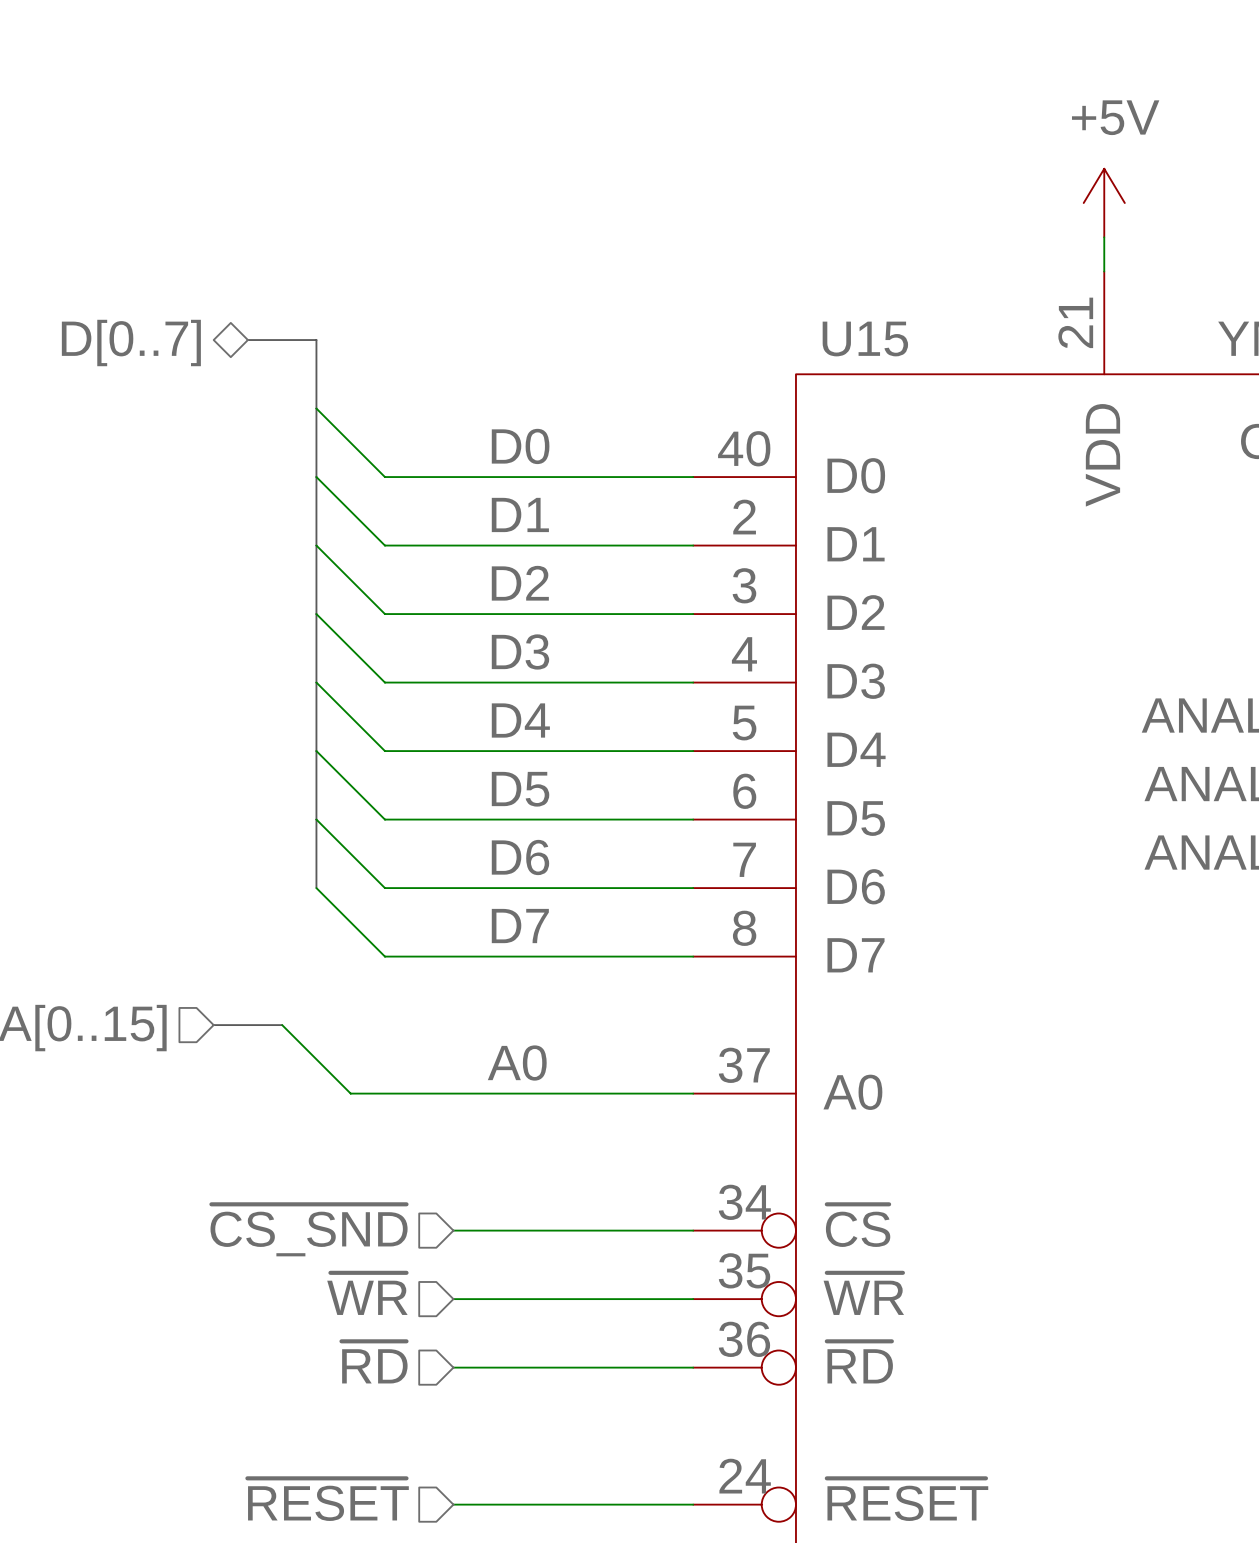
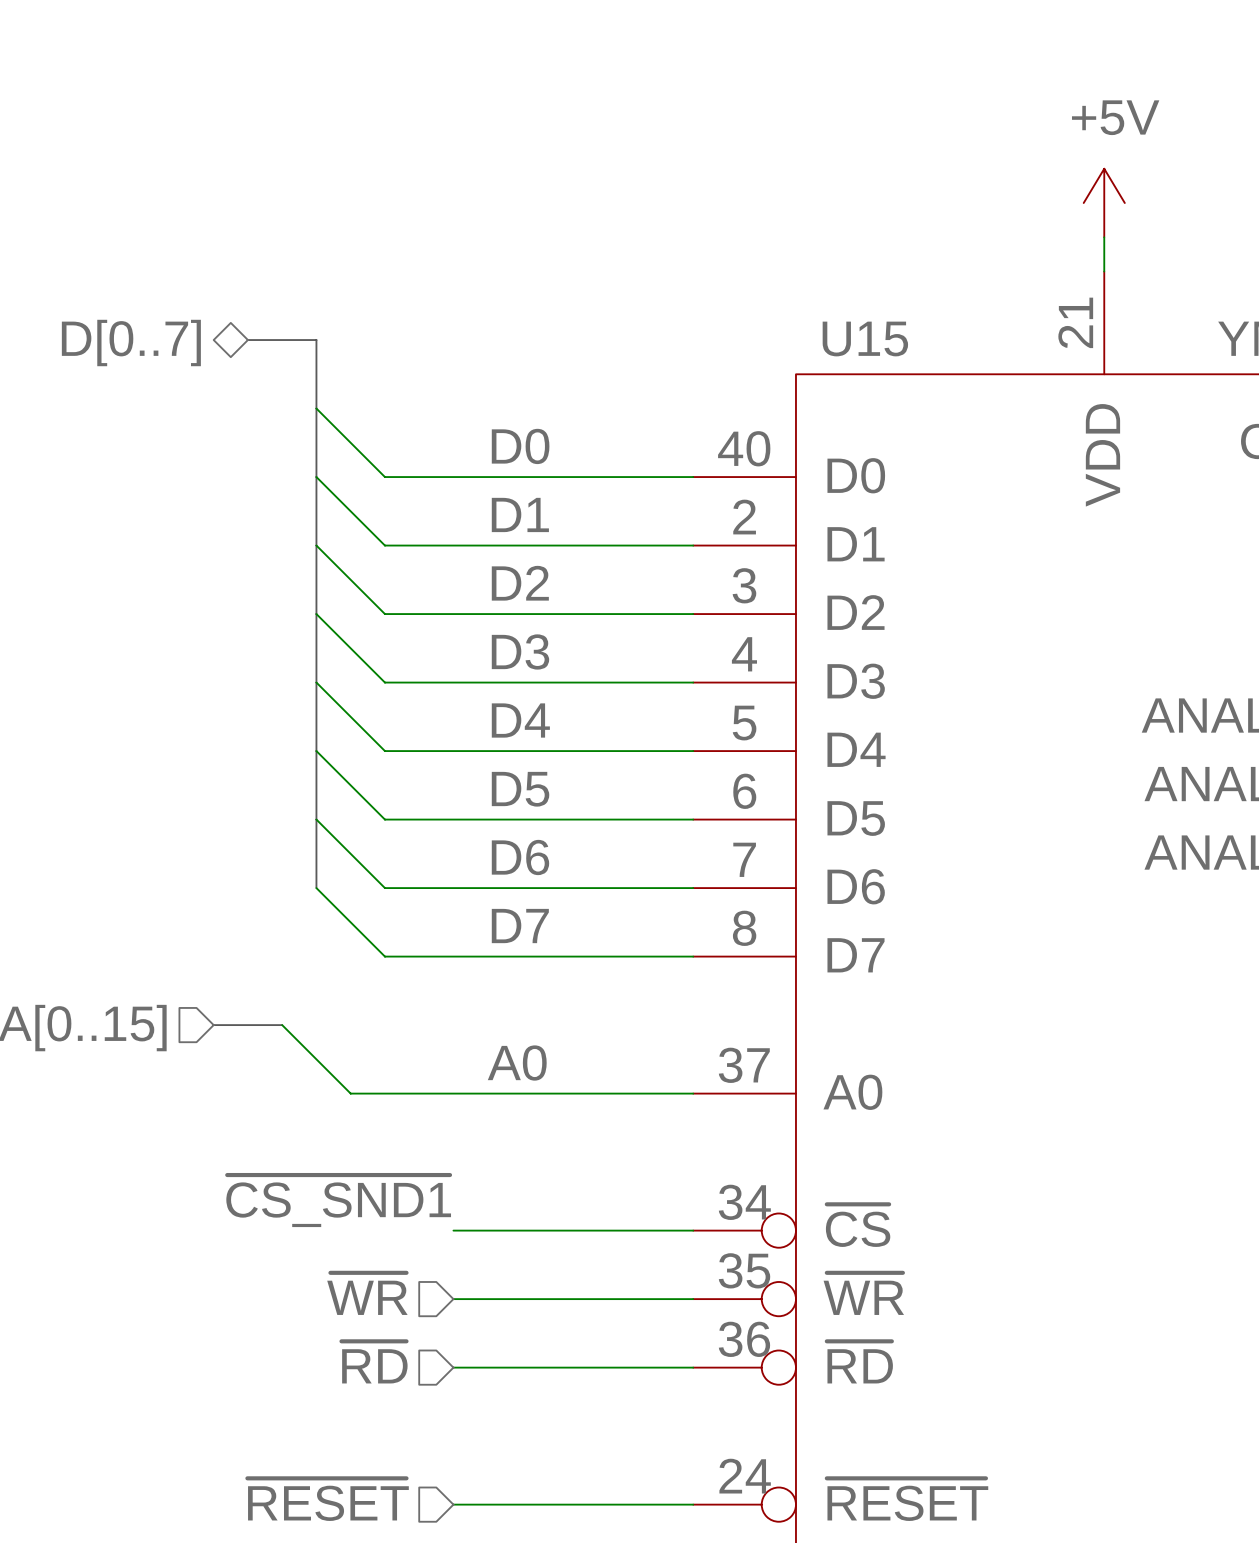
label: none -> ~{CS_SND1} (338, 1201)
hierarchical label: ~{CS_SND} (309, 1230) -> none

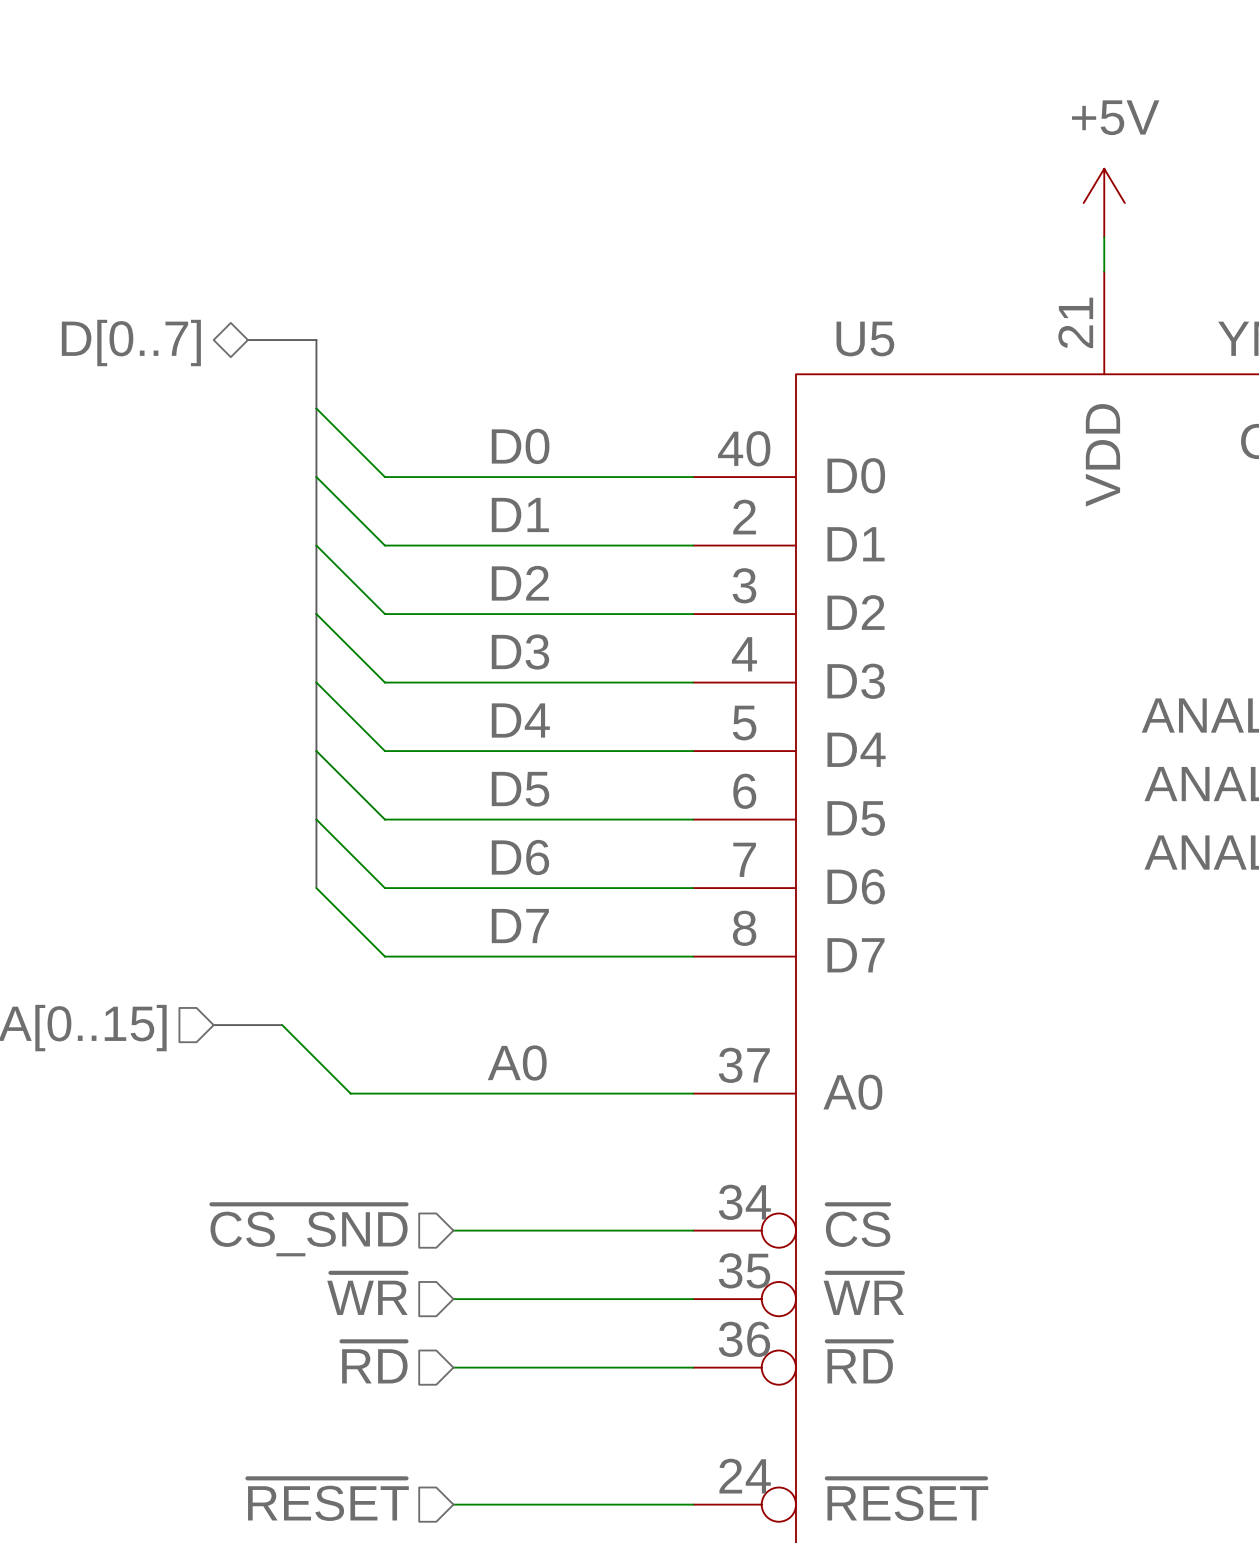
U15 name: U15 (865, 338) -> U5 (865, 338)
label: ~{CS_SND1} (338, 1201) -> none
hierarchical label: none -> ~{CS_SND} (309, 1230)

